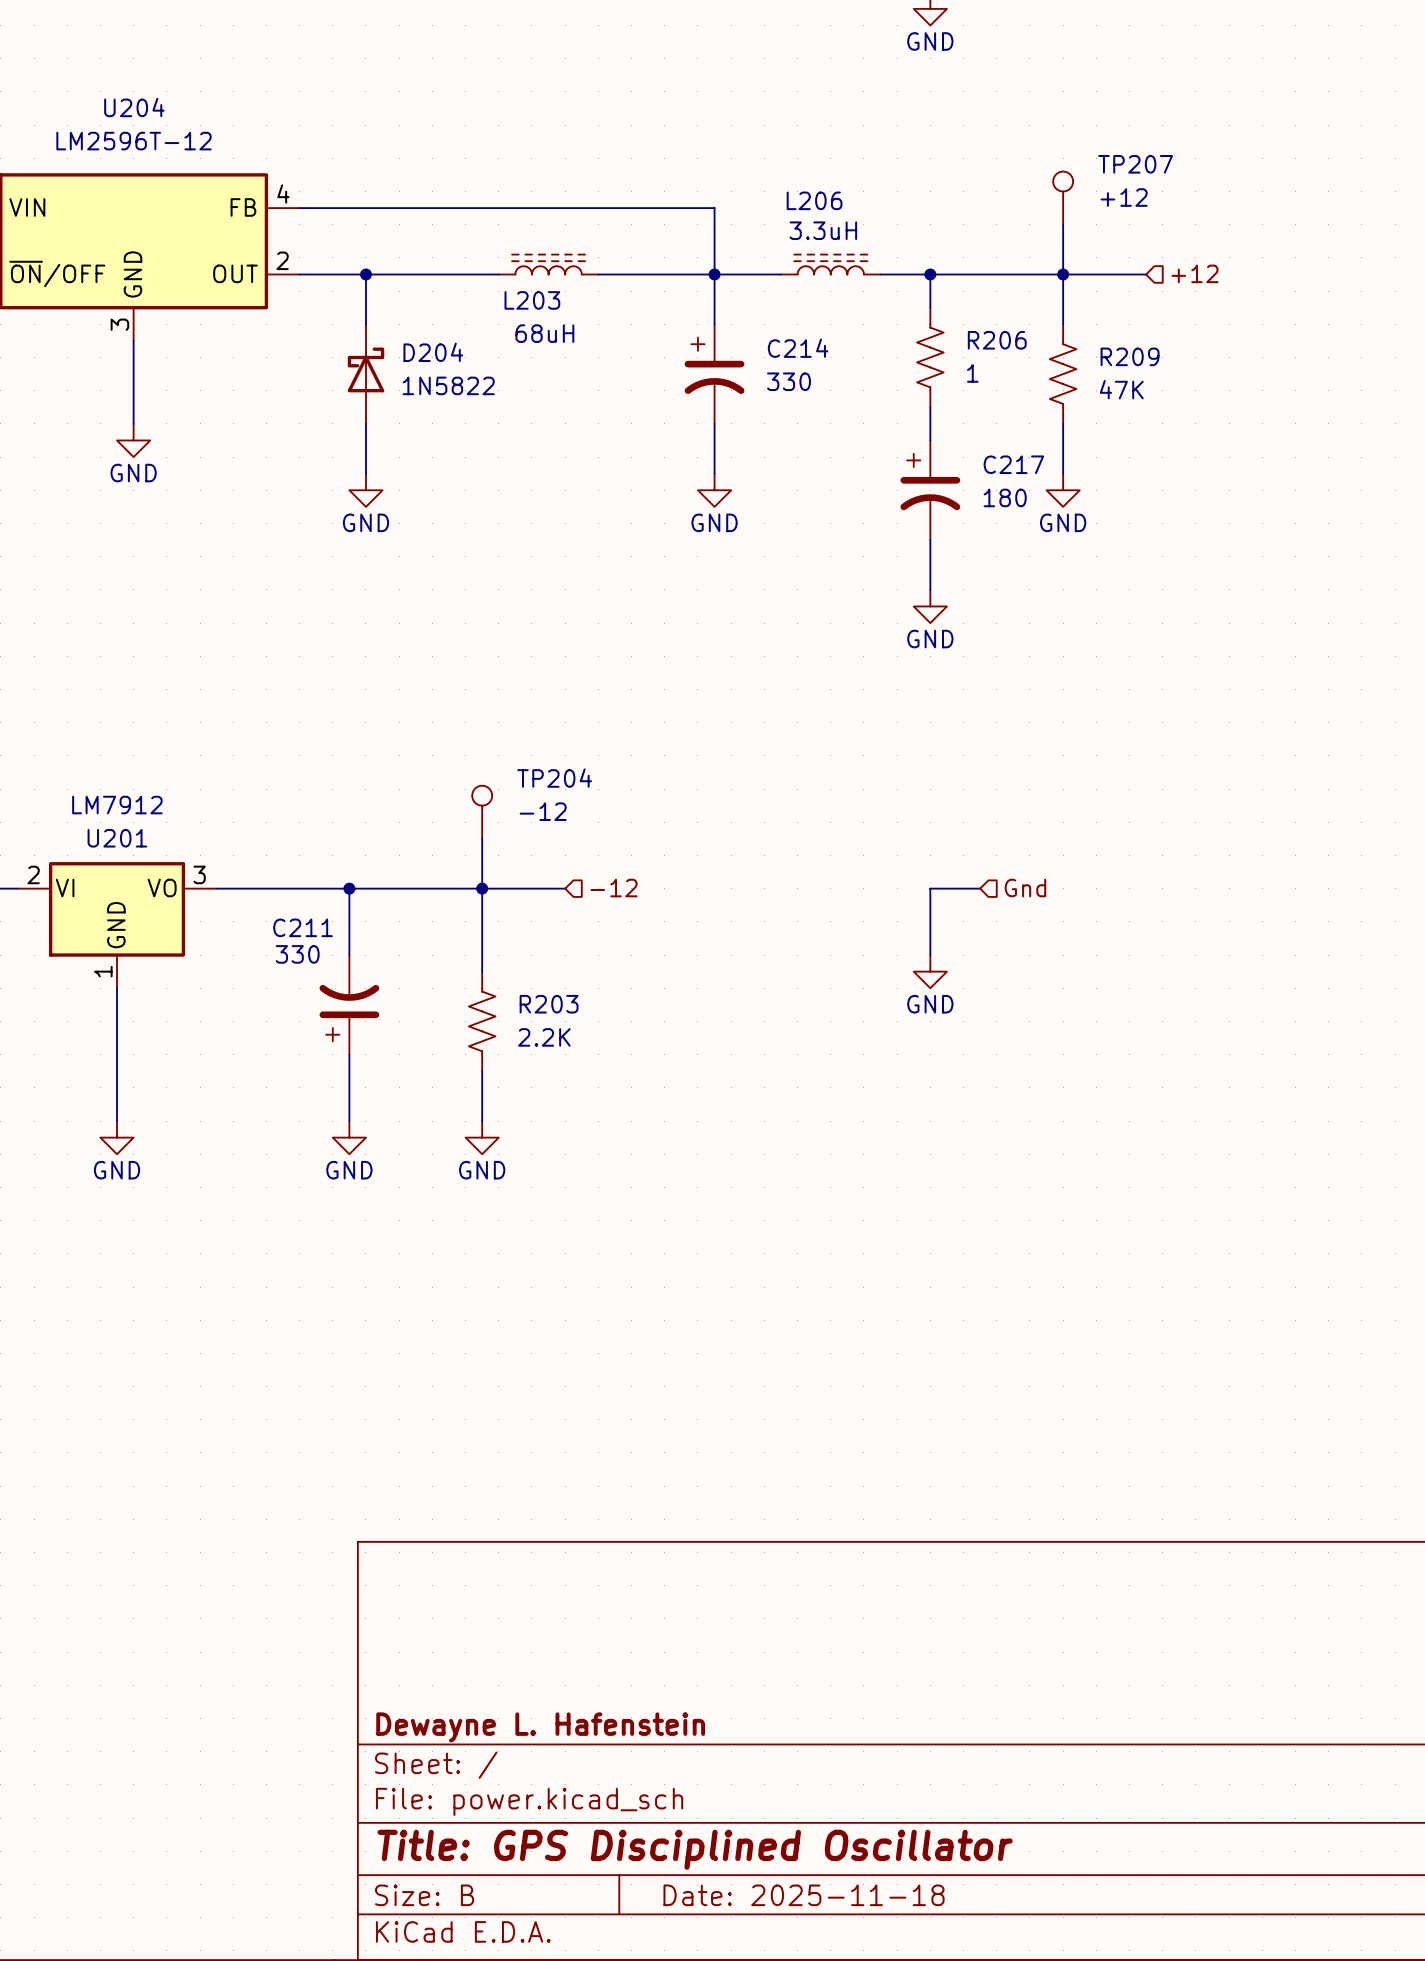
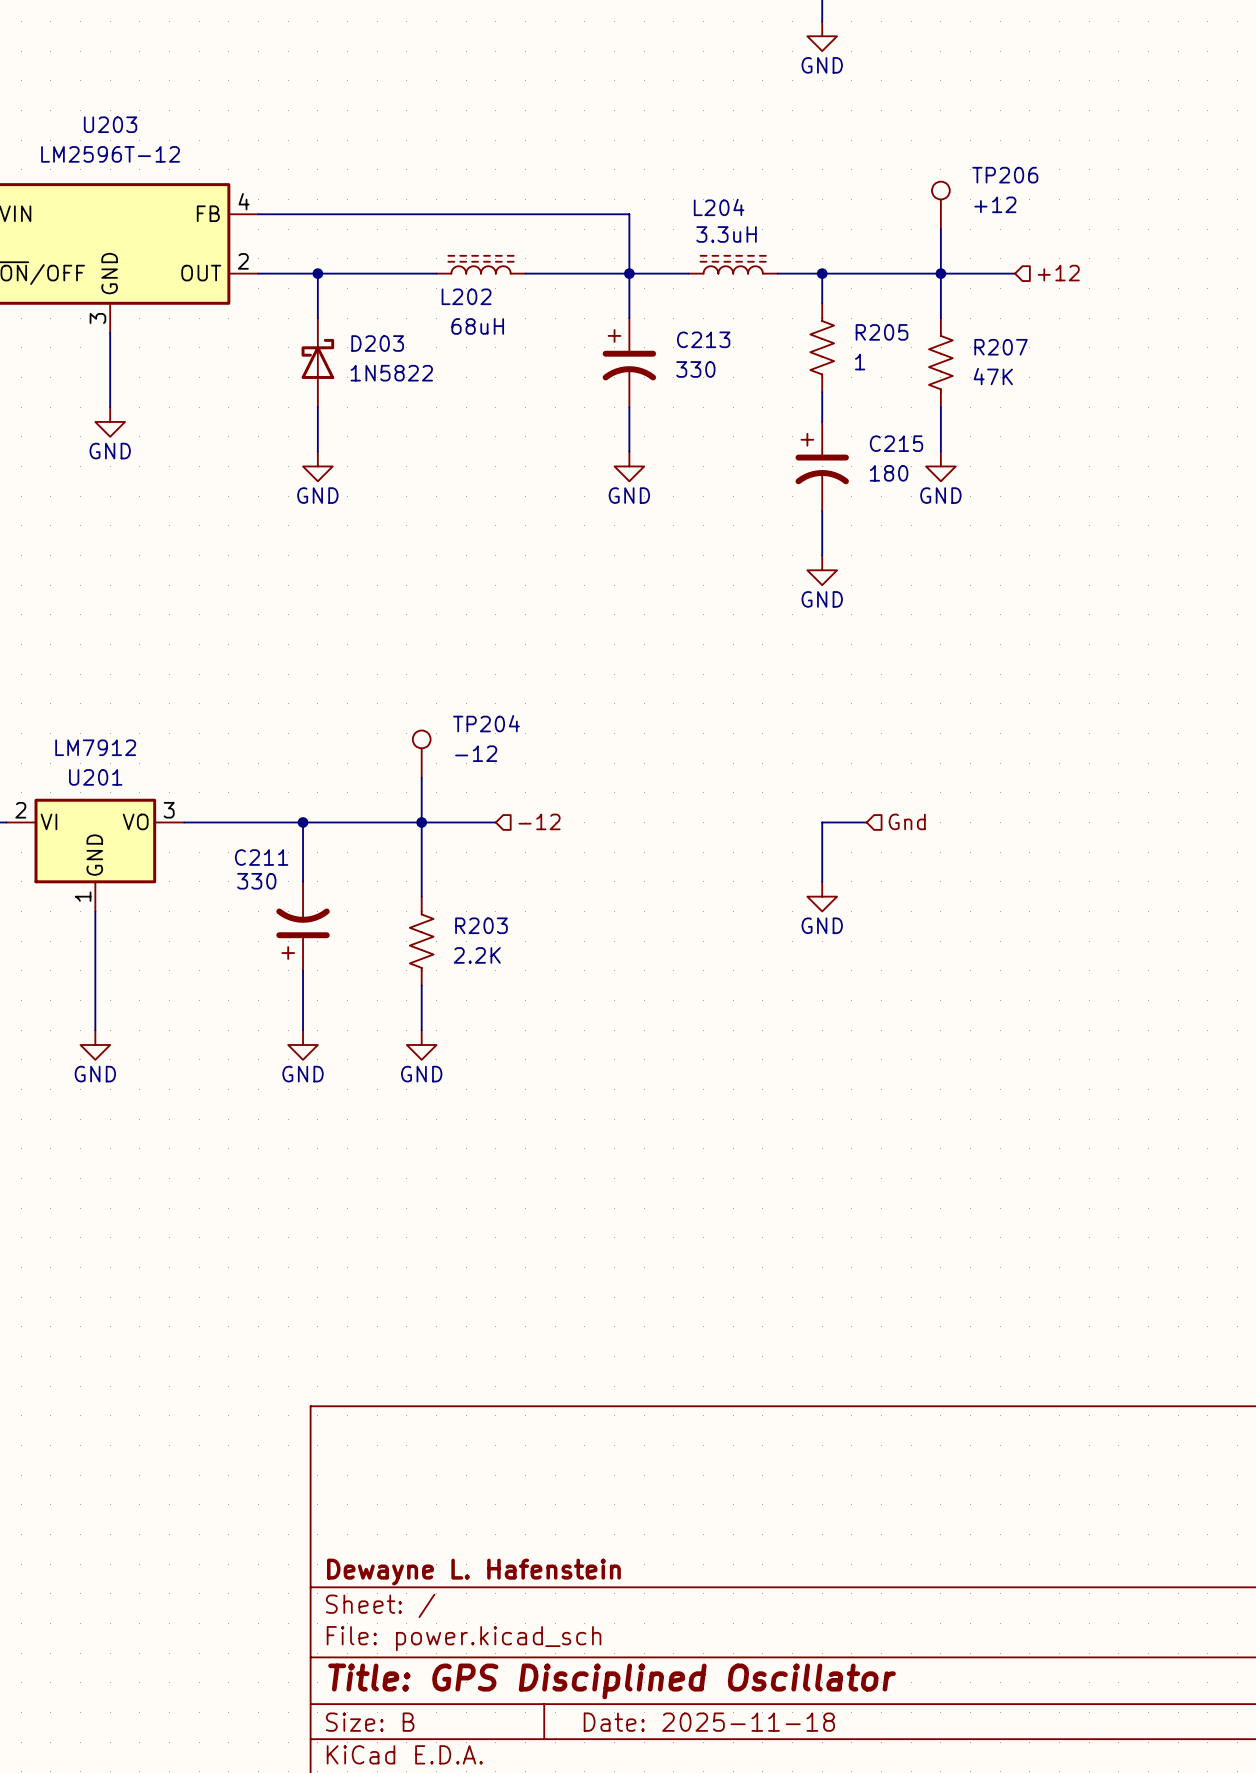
U204 name: U204 (134, 107) -> U203 (110, 124)
TP207 name: TP207 (1135, 164) -> TP206 (1005, 175)
L206 name: L206 (814, 200) -> L204 (719, 207)
L203 name: L203 (532, 300) -> L202 (466, 296)
R206 name: R206 (997, 340) -> R205 (882, 332)
C214 name: C214 (798, 348) -> C213 (703, 339)
D204 name: D204 (433, 352) -> D203 (377, 343)
R209 name: R209 (1130, 356) -> R207 (1001, 347)
C217 name: C217 (1013, 464) -> C215 (896, 443)

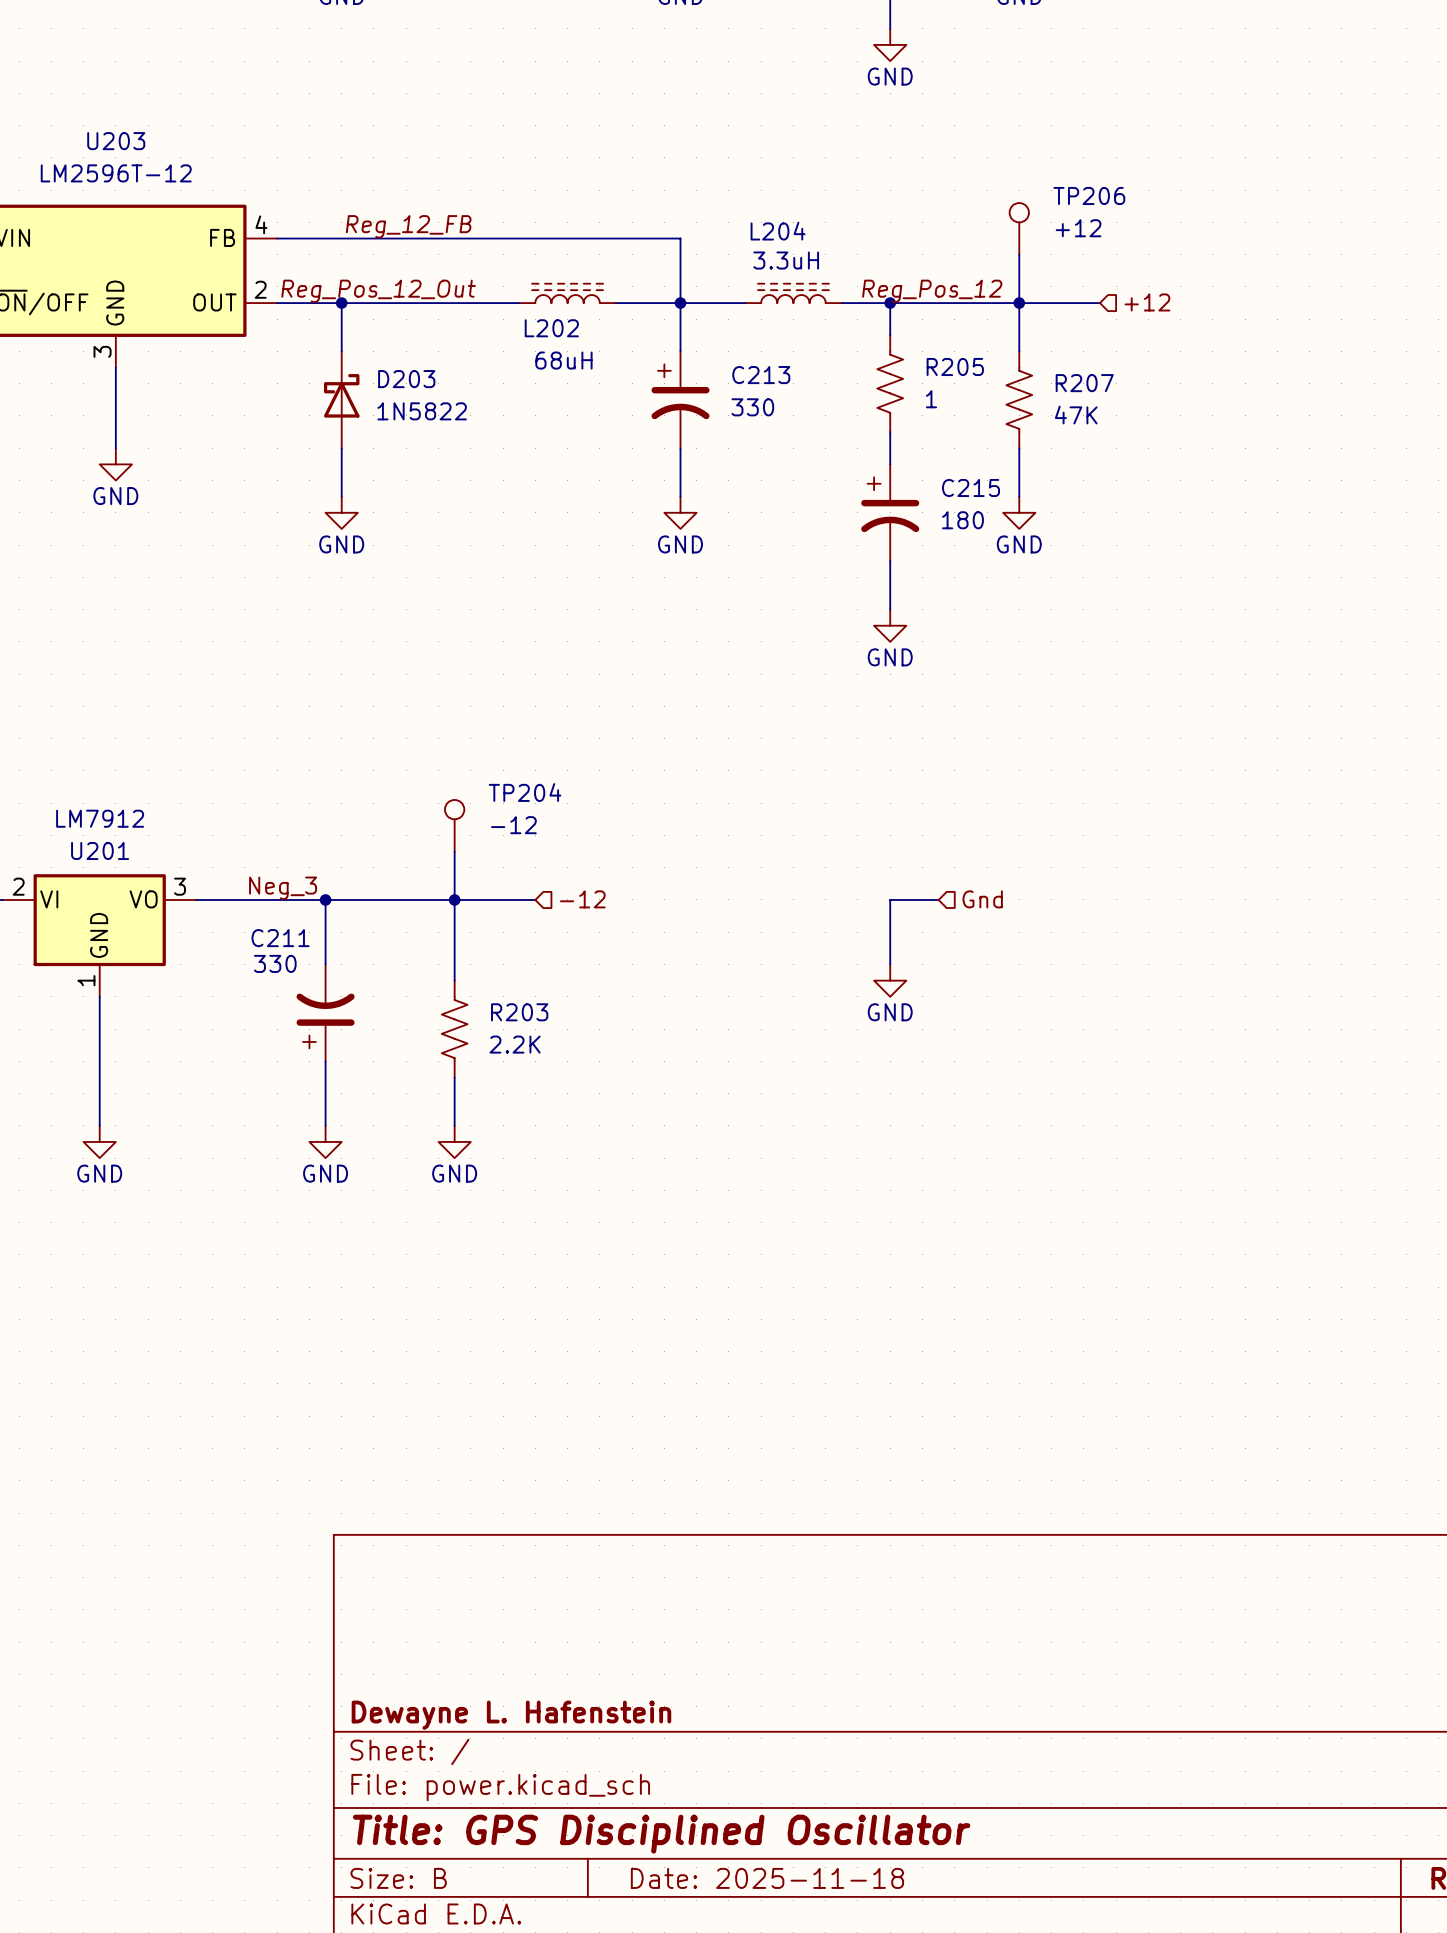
label: none -> Reg_12_FB (408, 226)
label: none -> Reg_Pos_12_Out (378, 291)
label: none -> Reg_Pos_12 (932, 291)
L202 position: (481, 264) -> (567, 293)
wire: (525, 273) (570, 273) -> (470, 303) (519, 303)
label: none -> Neg_3 (283, 888)

